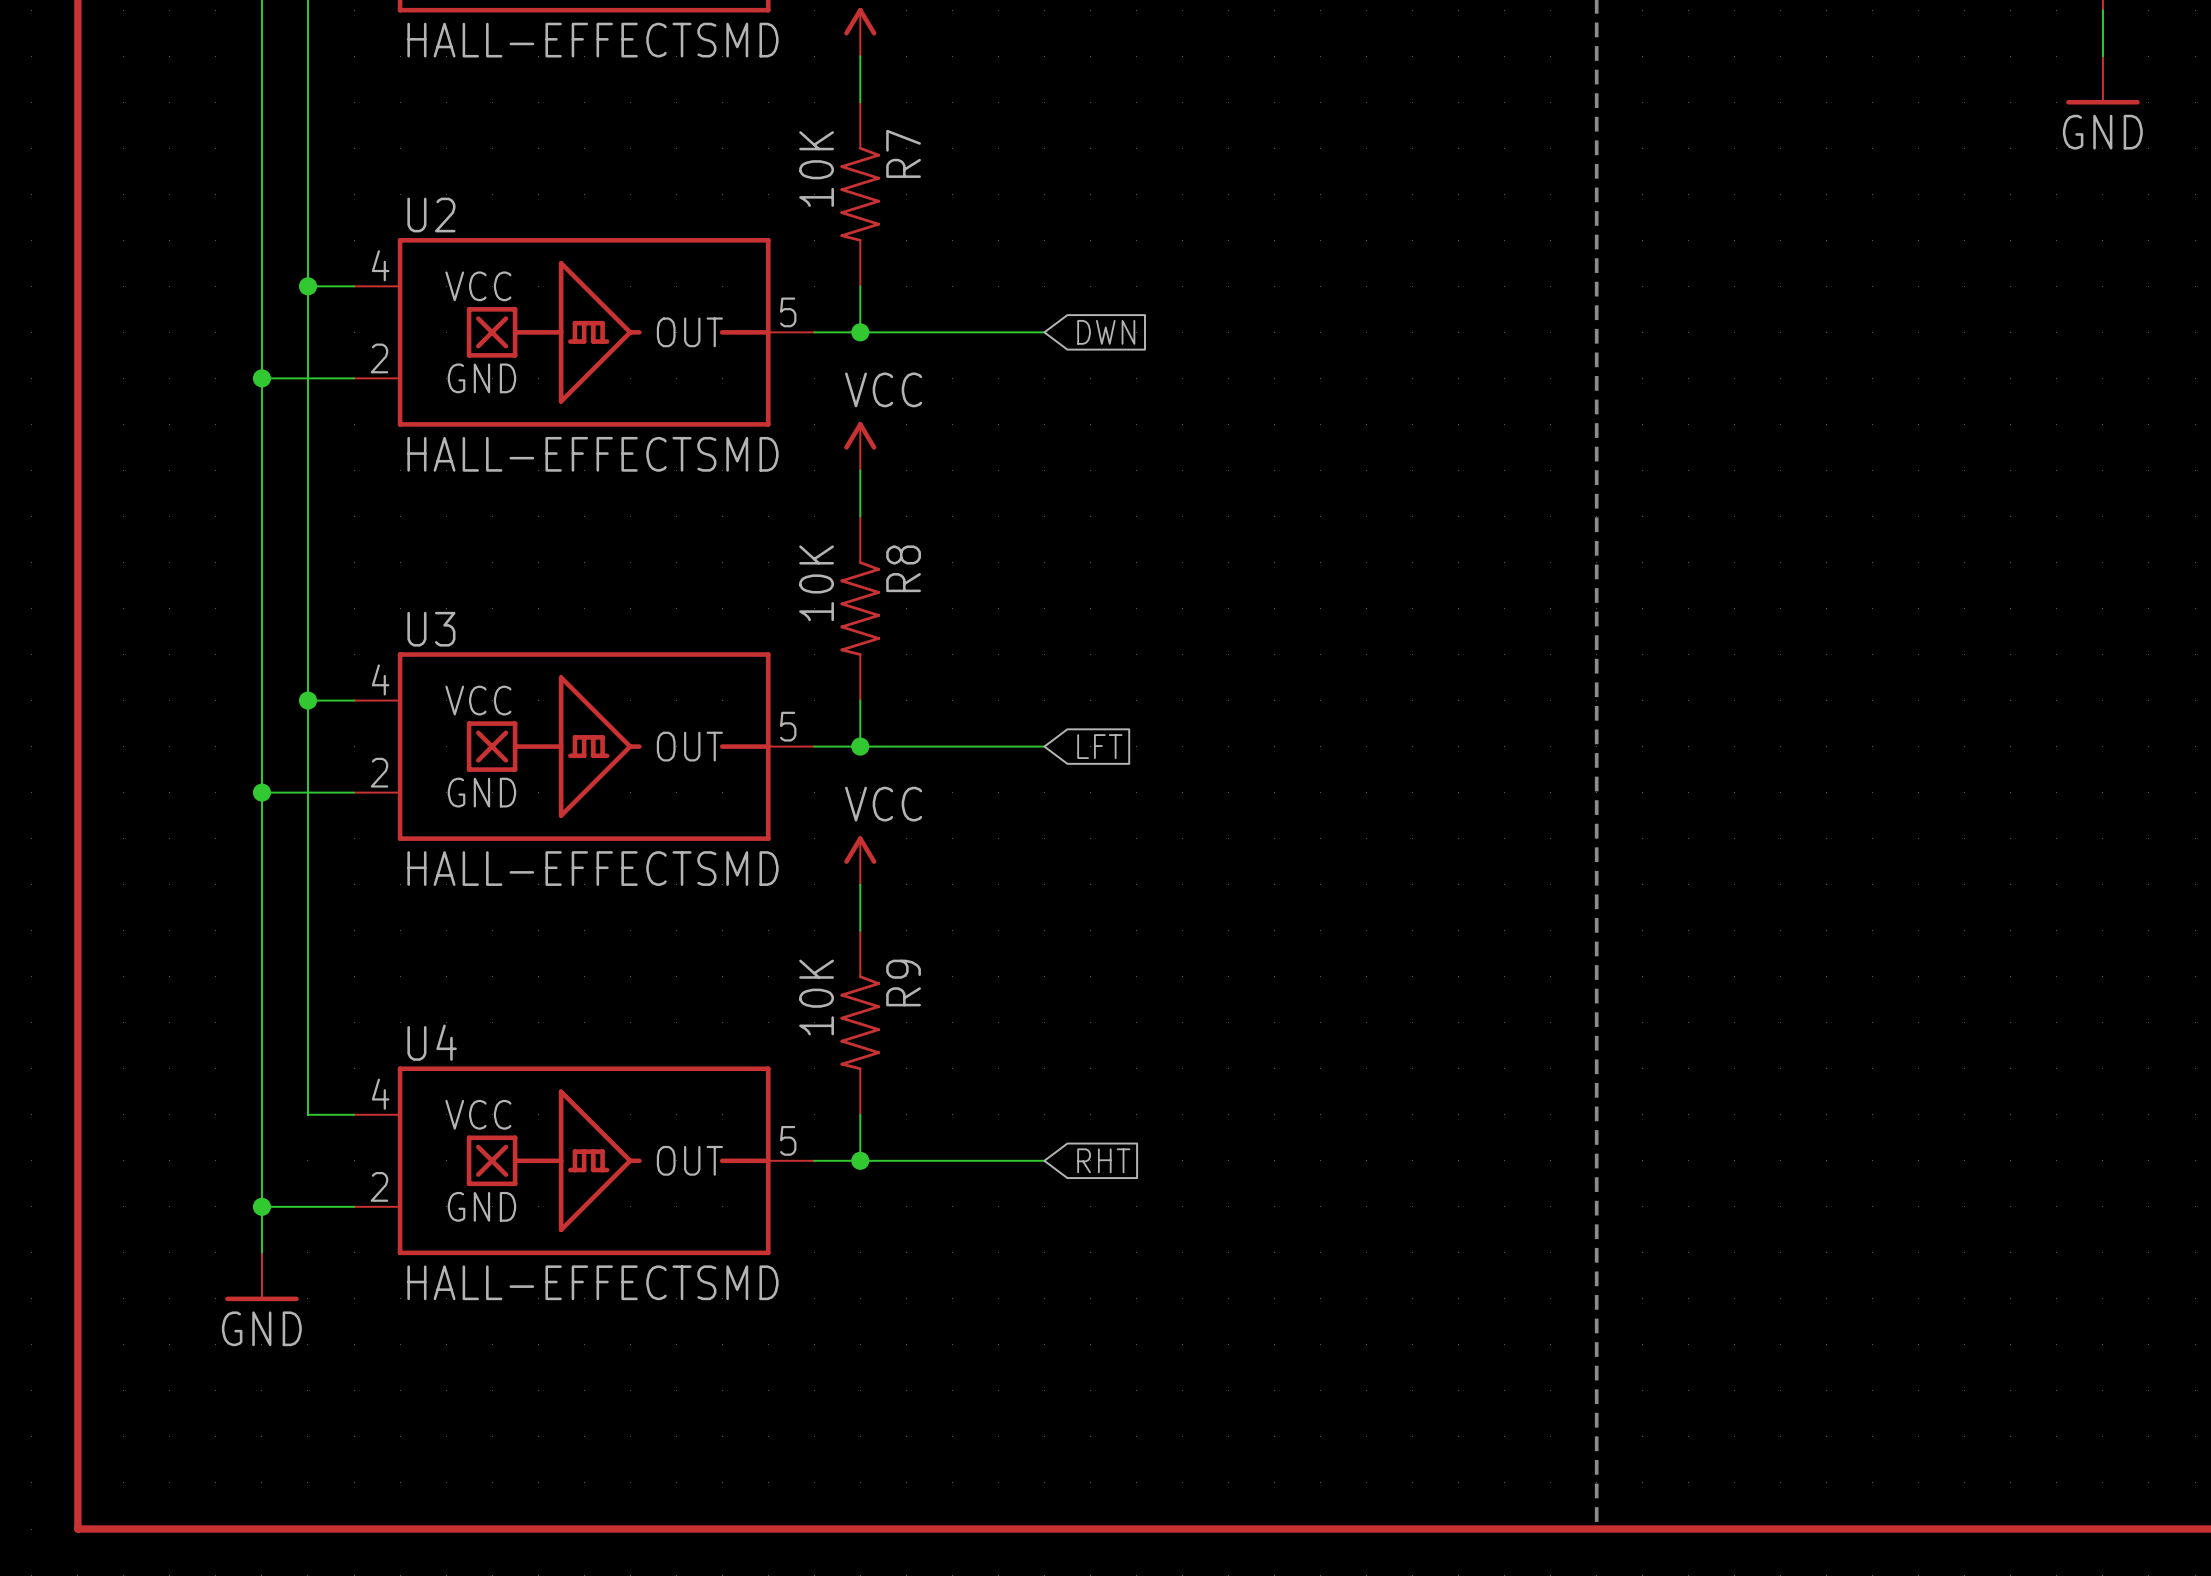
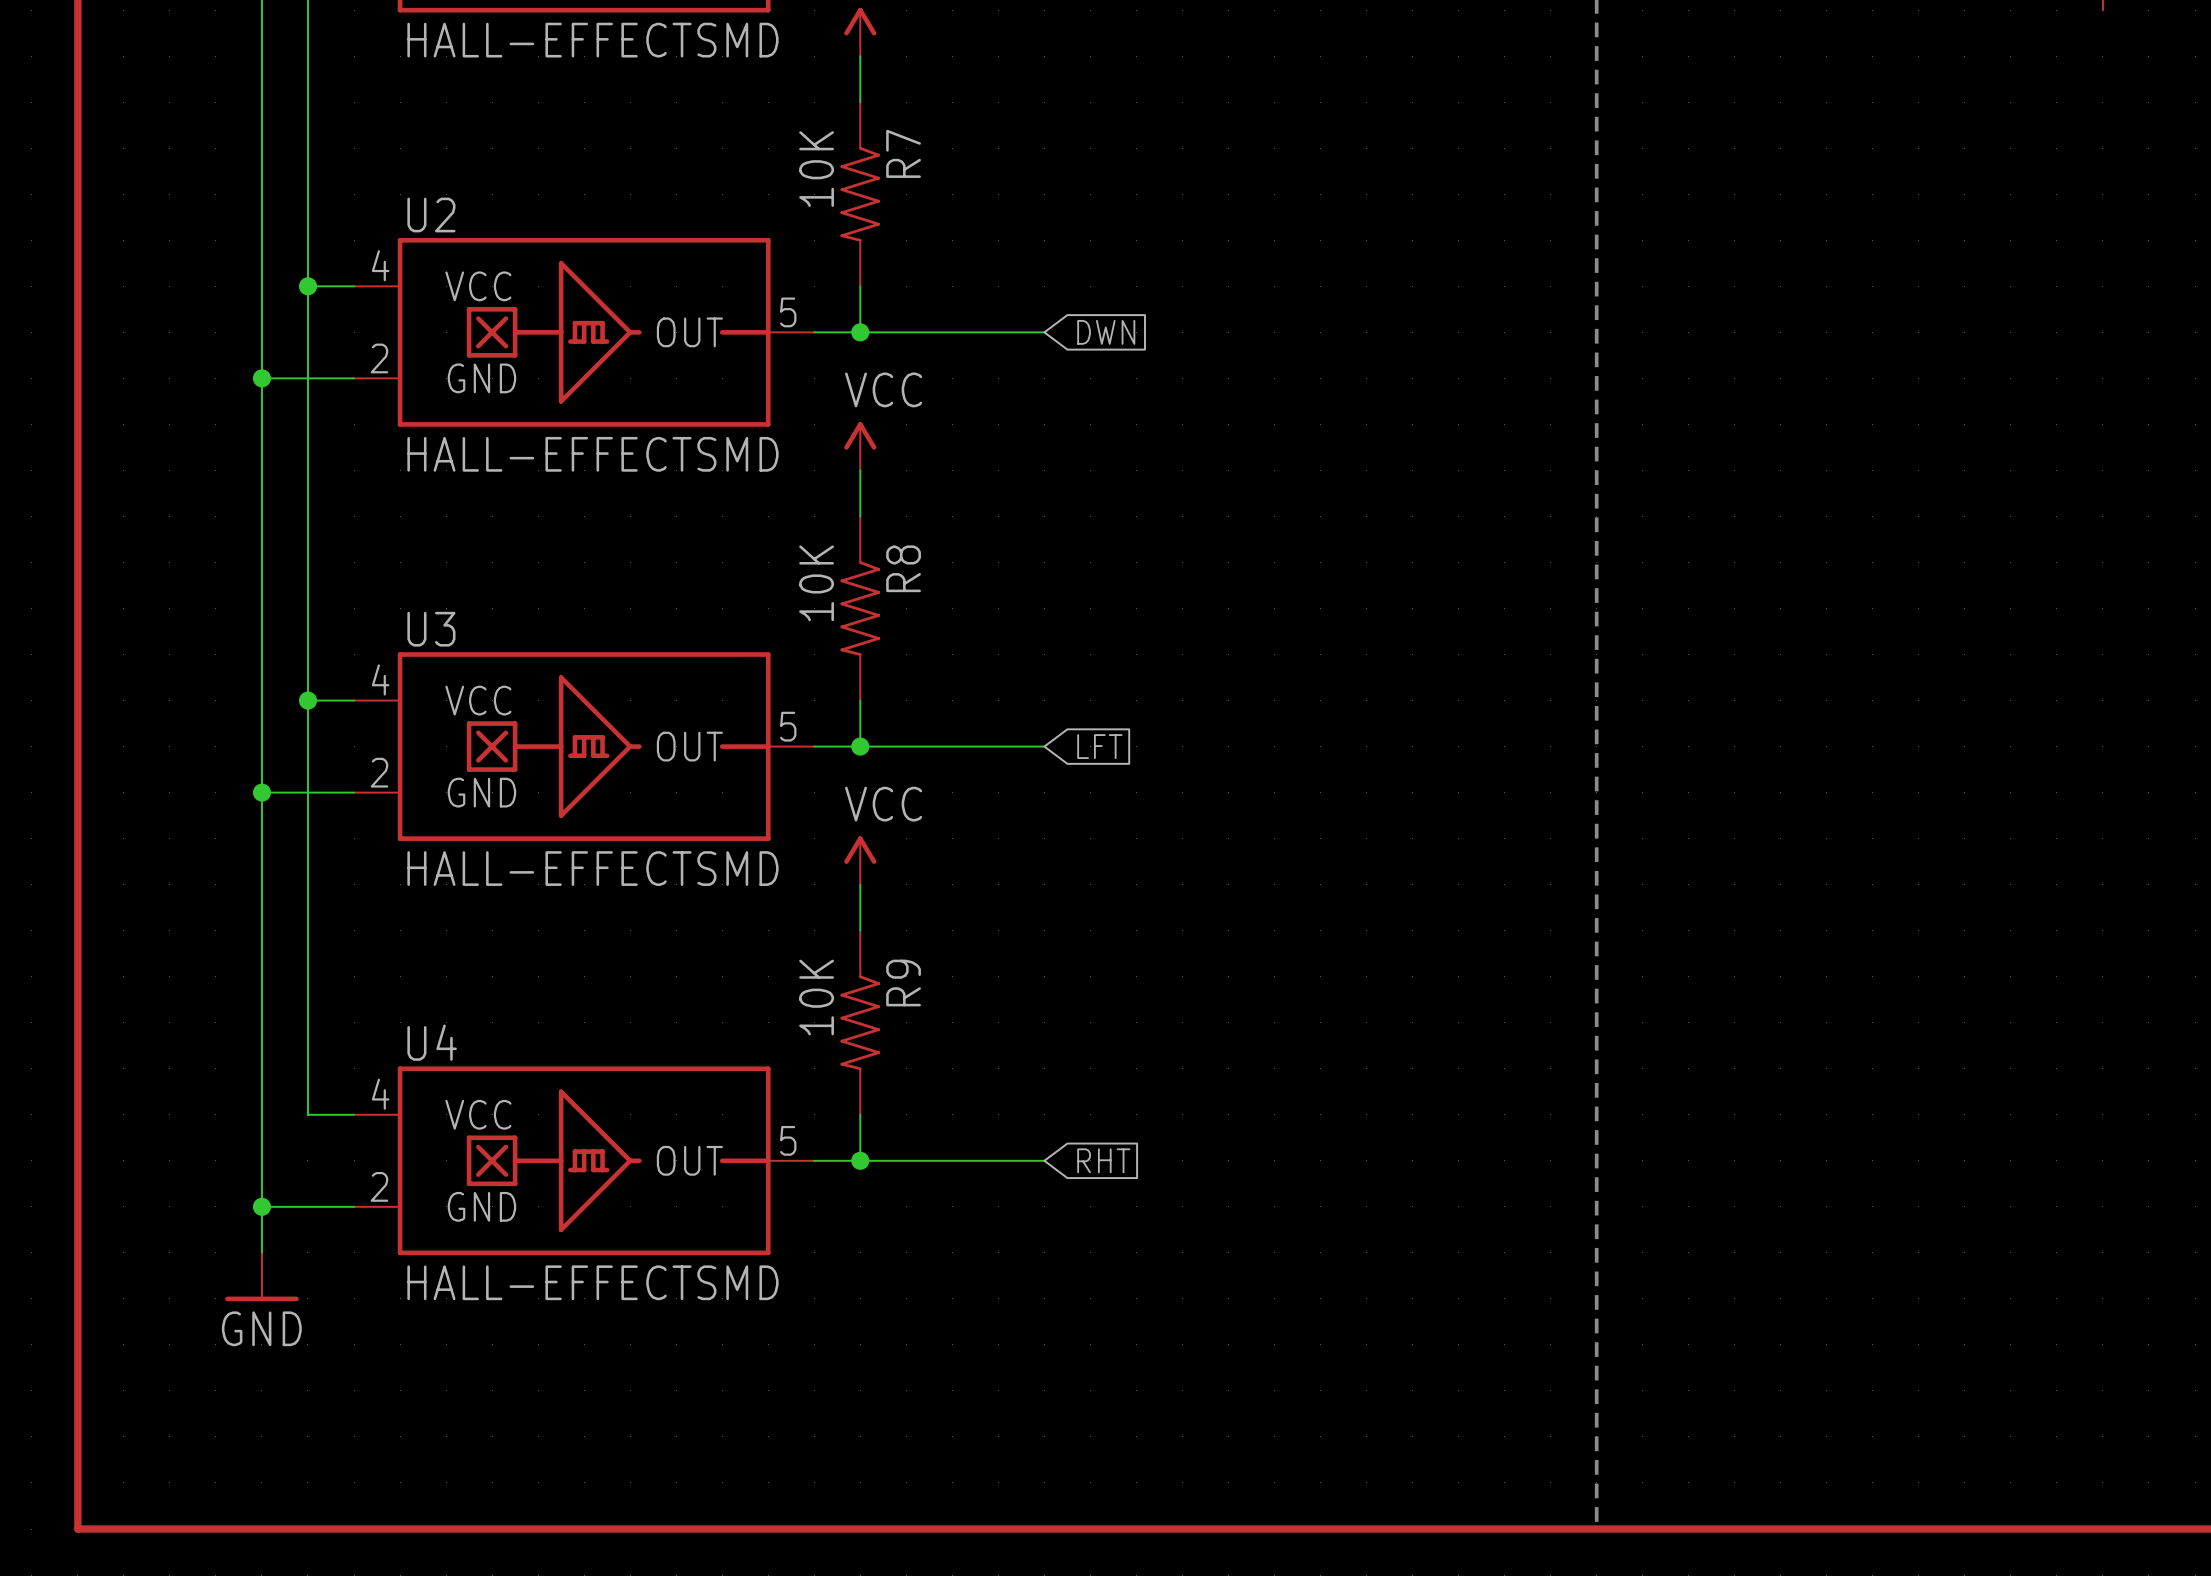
wire: (2102, 10) (2102, 56) -> none
power symbol: GND (2102, 80) -> none

